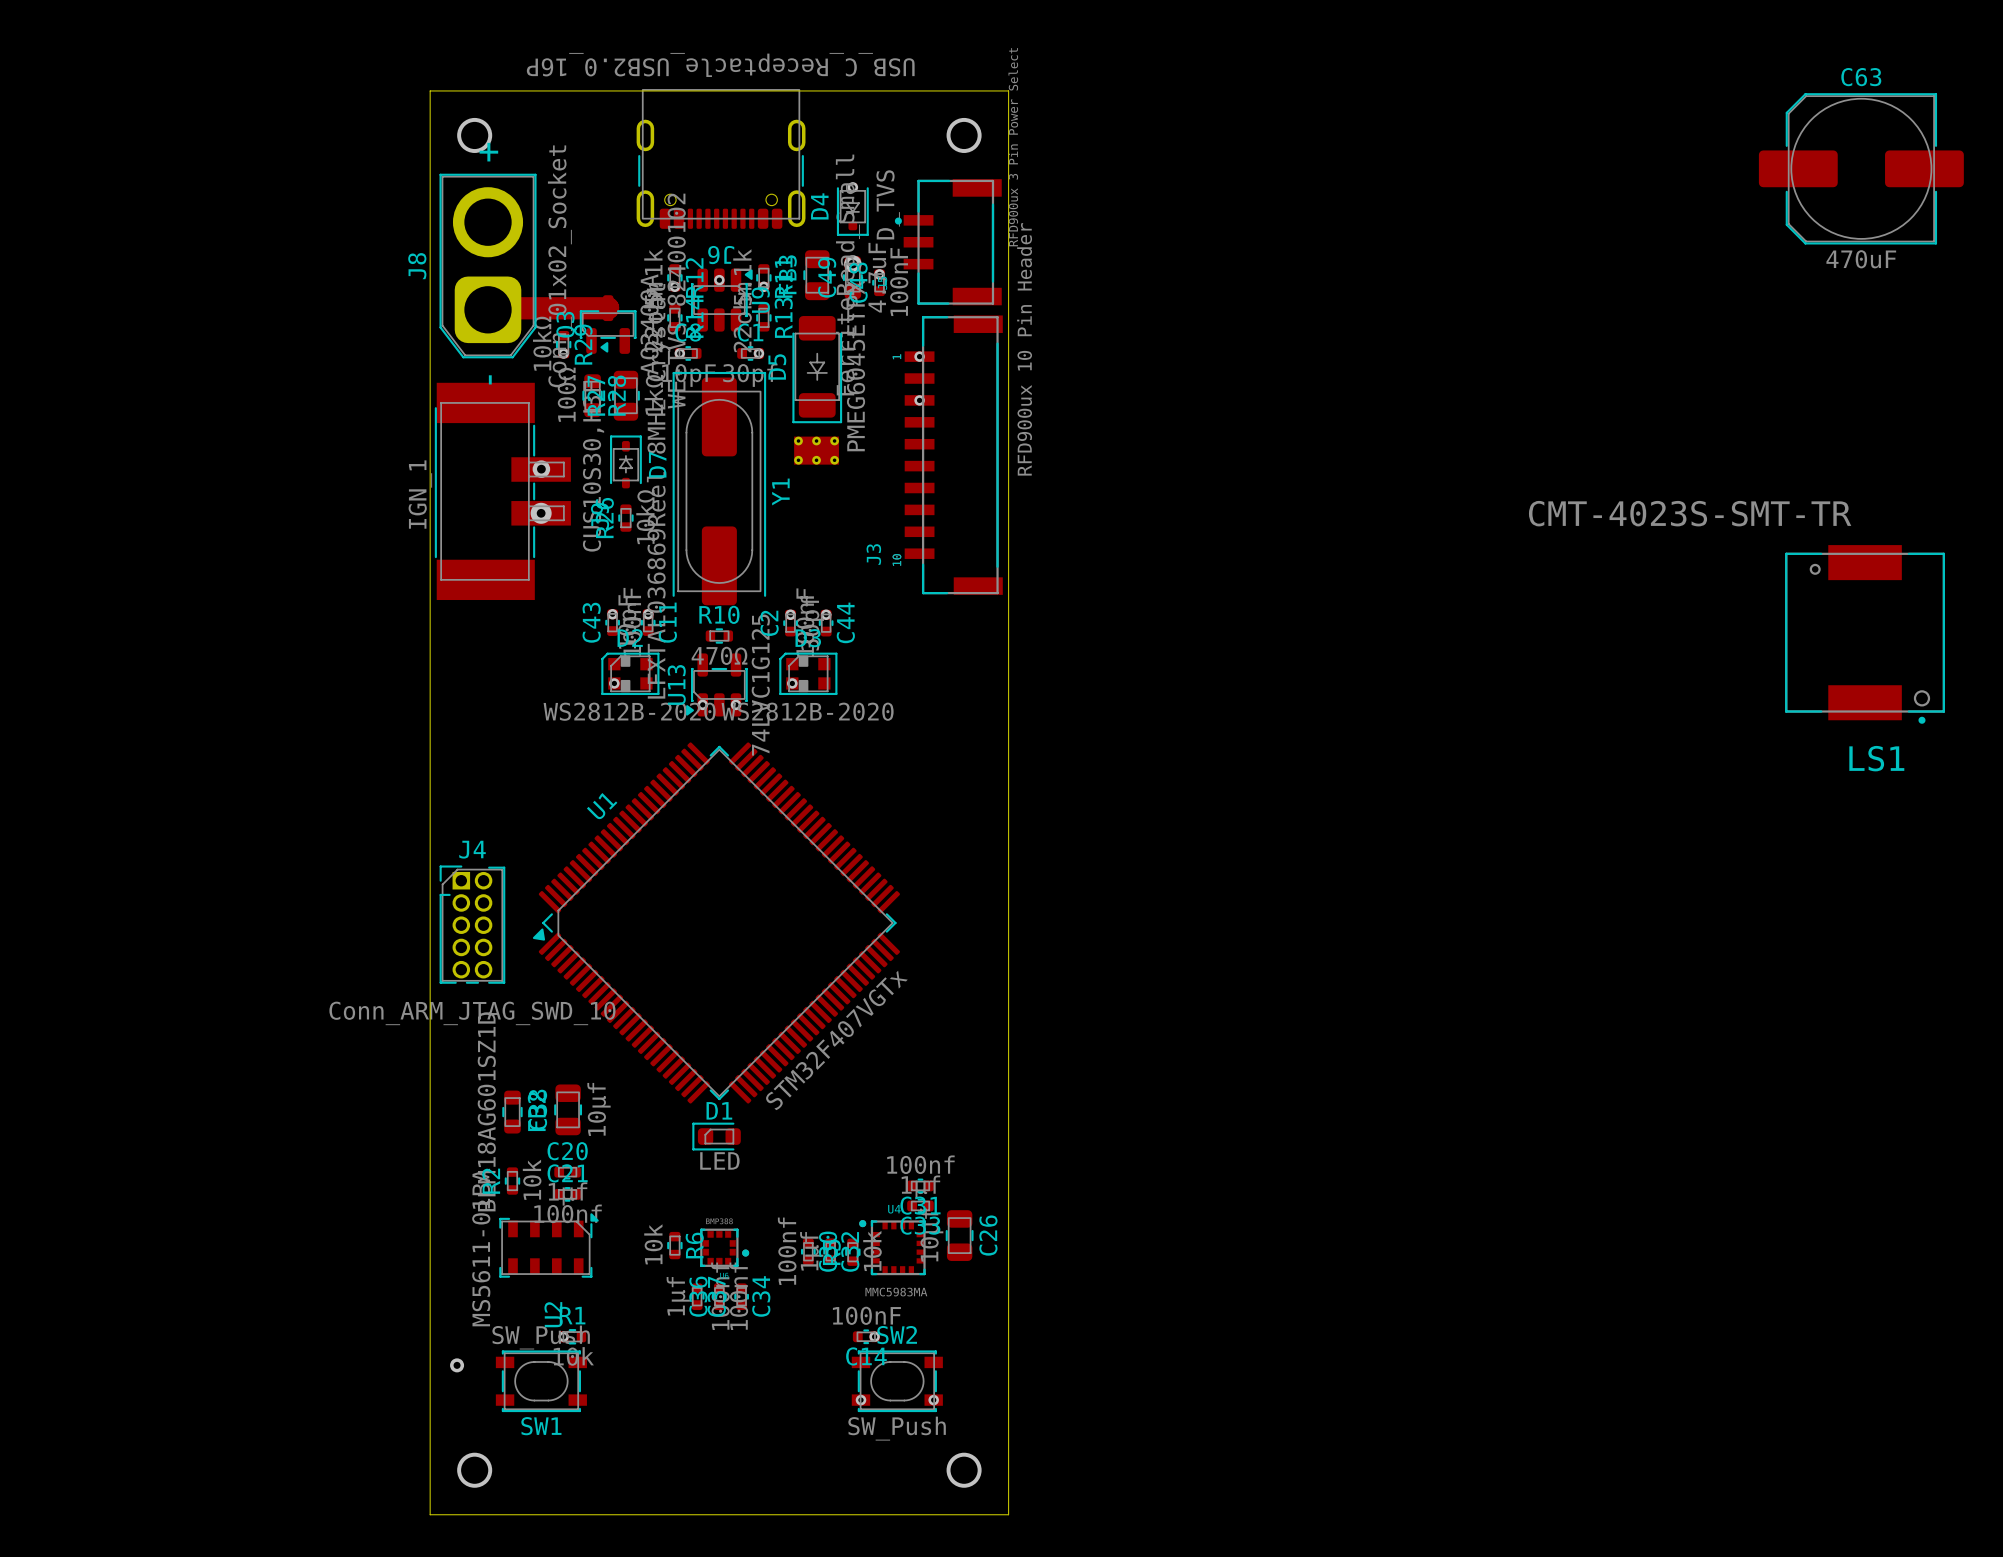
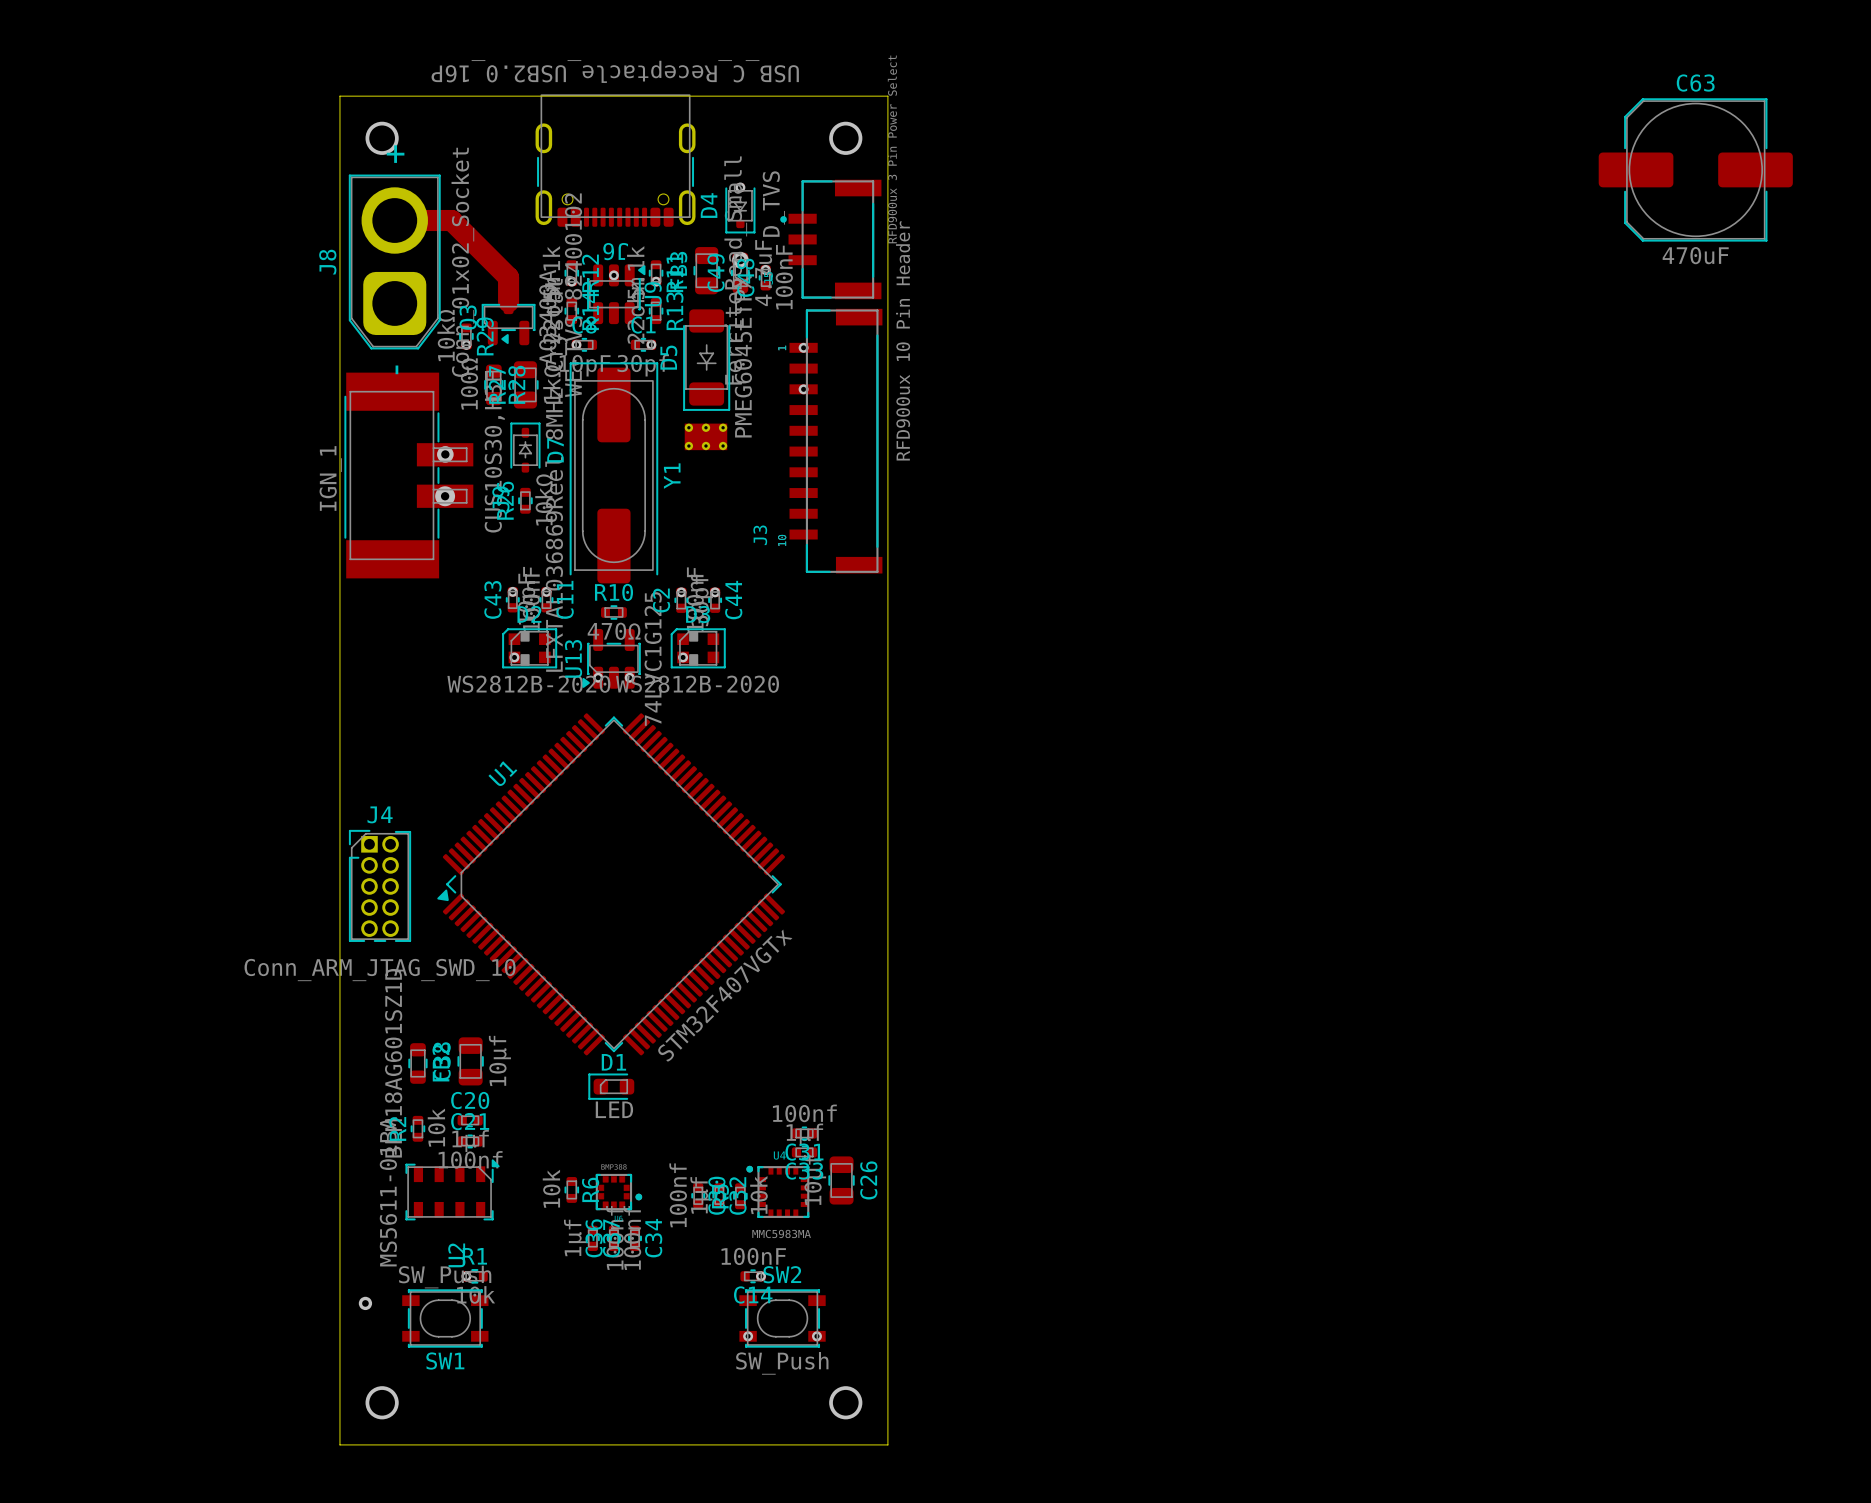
track: (488, 308) (607, 308) -> (394, 220) (451, 220) (508, 277) (508, 301)
LS1: CMT-4023S-SMT-TR (1865, 634) -> none

